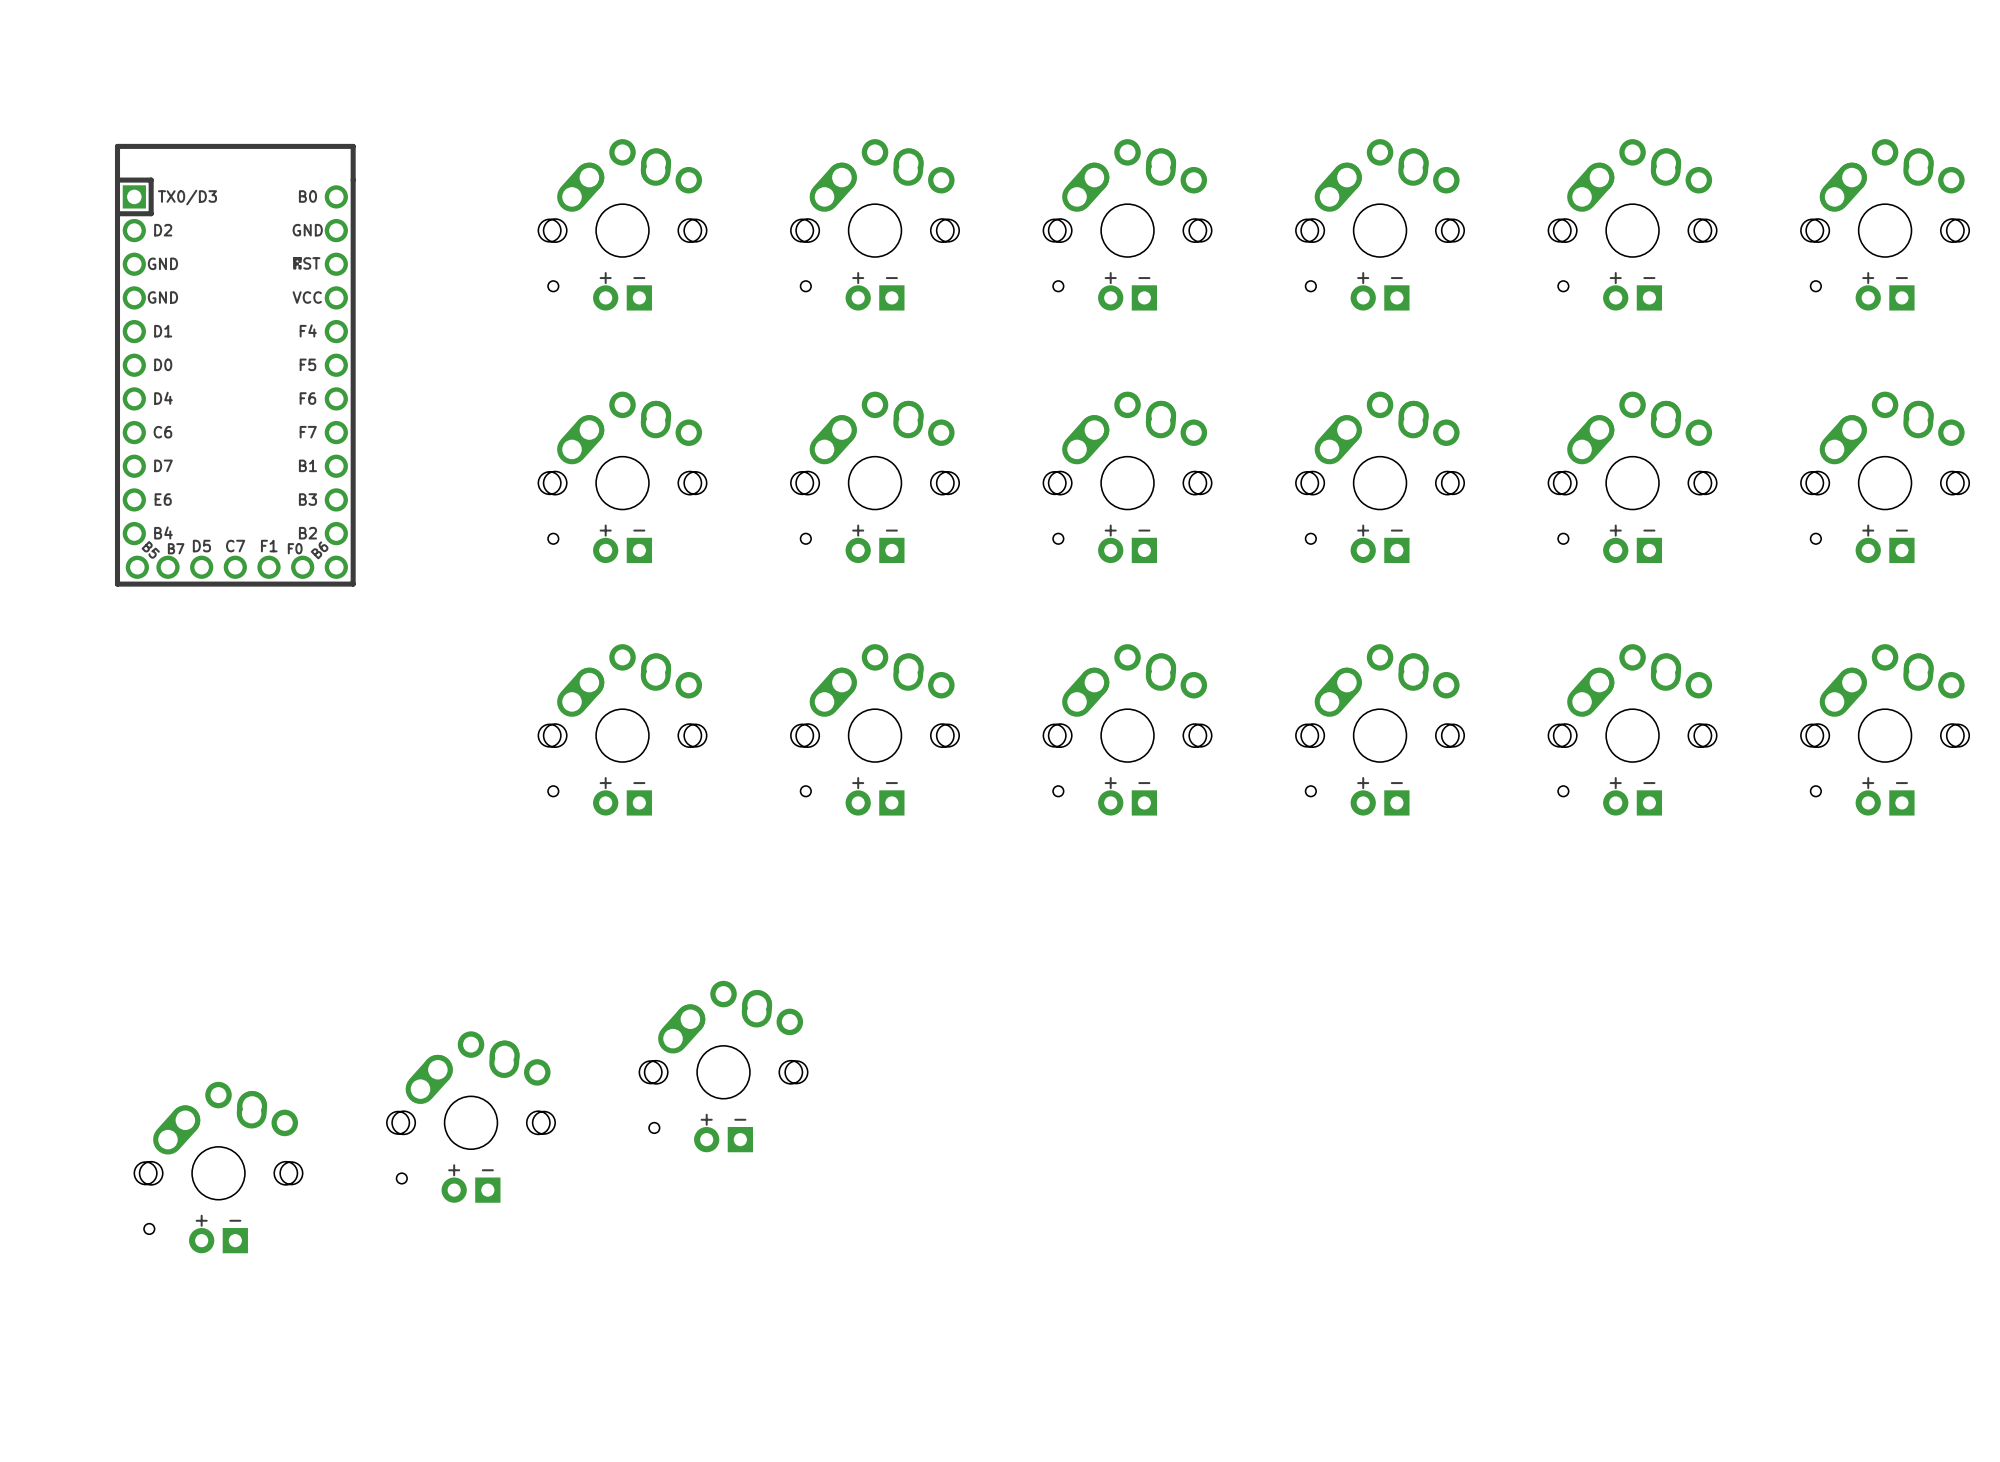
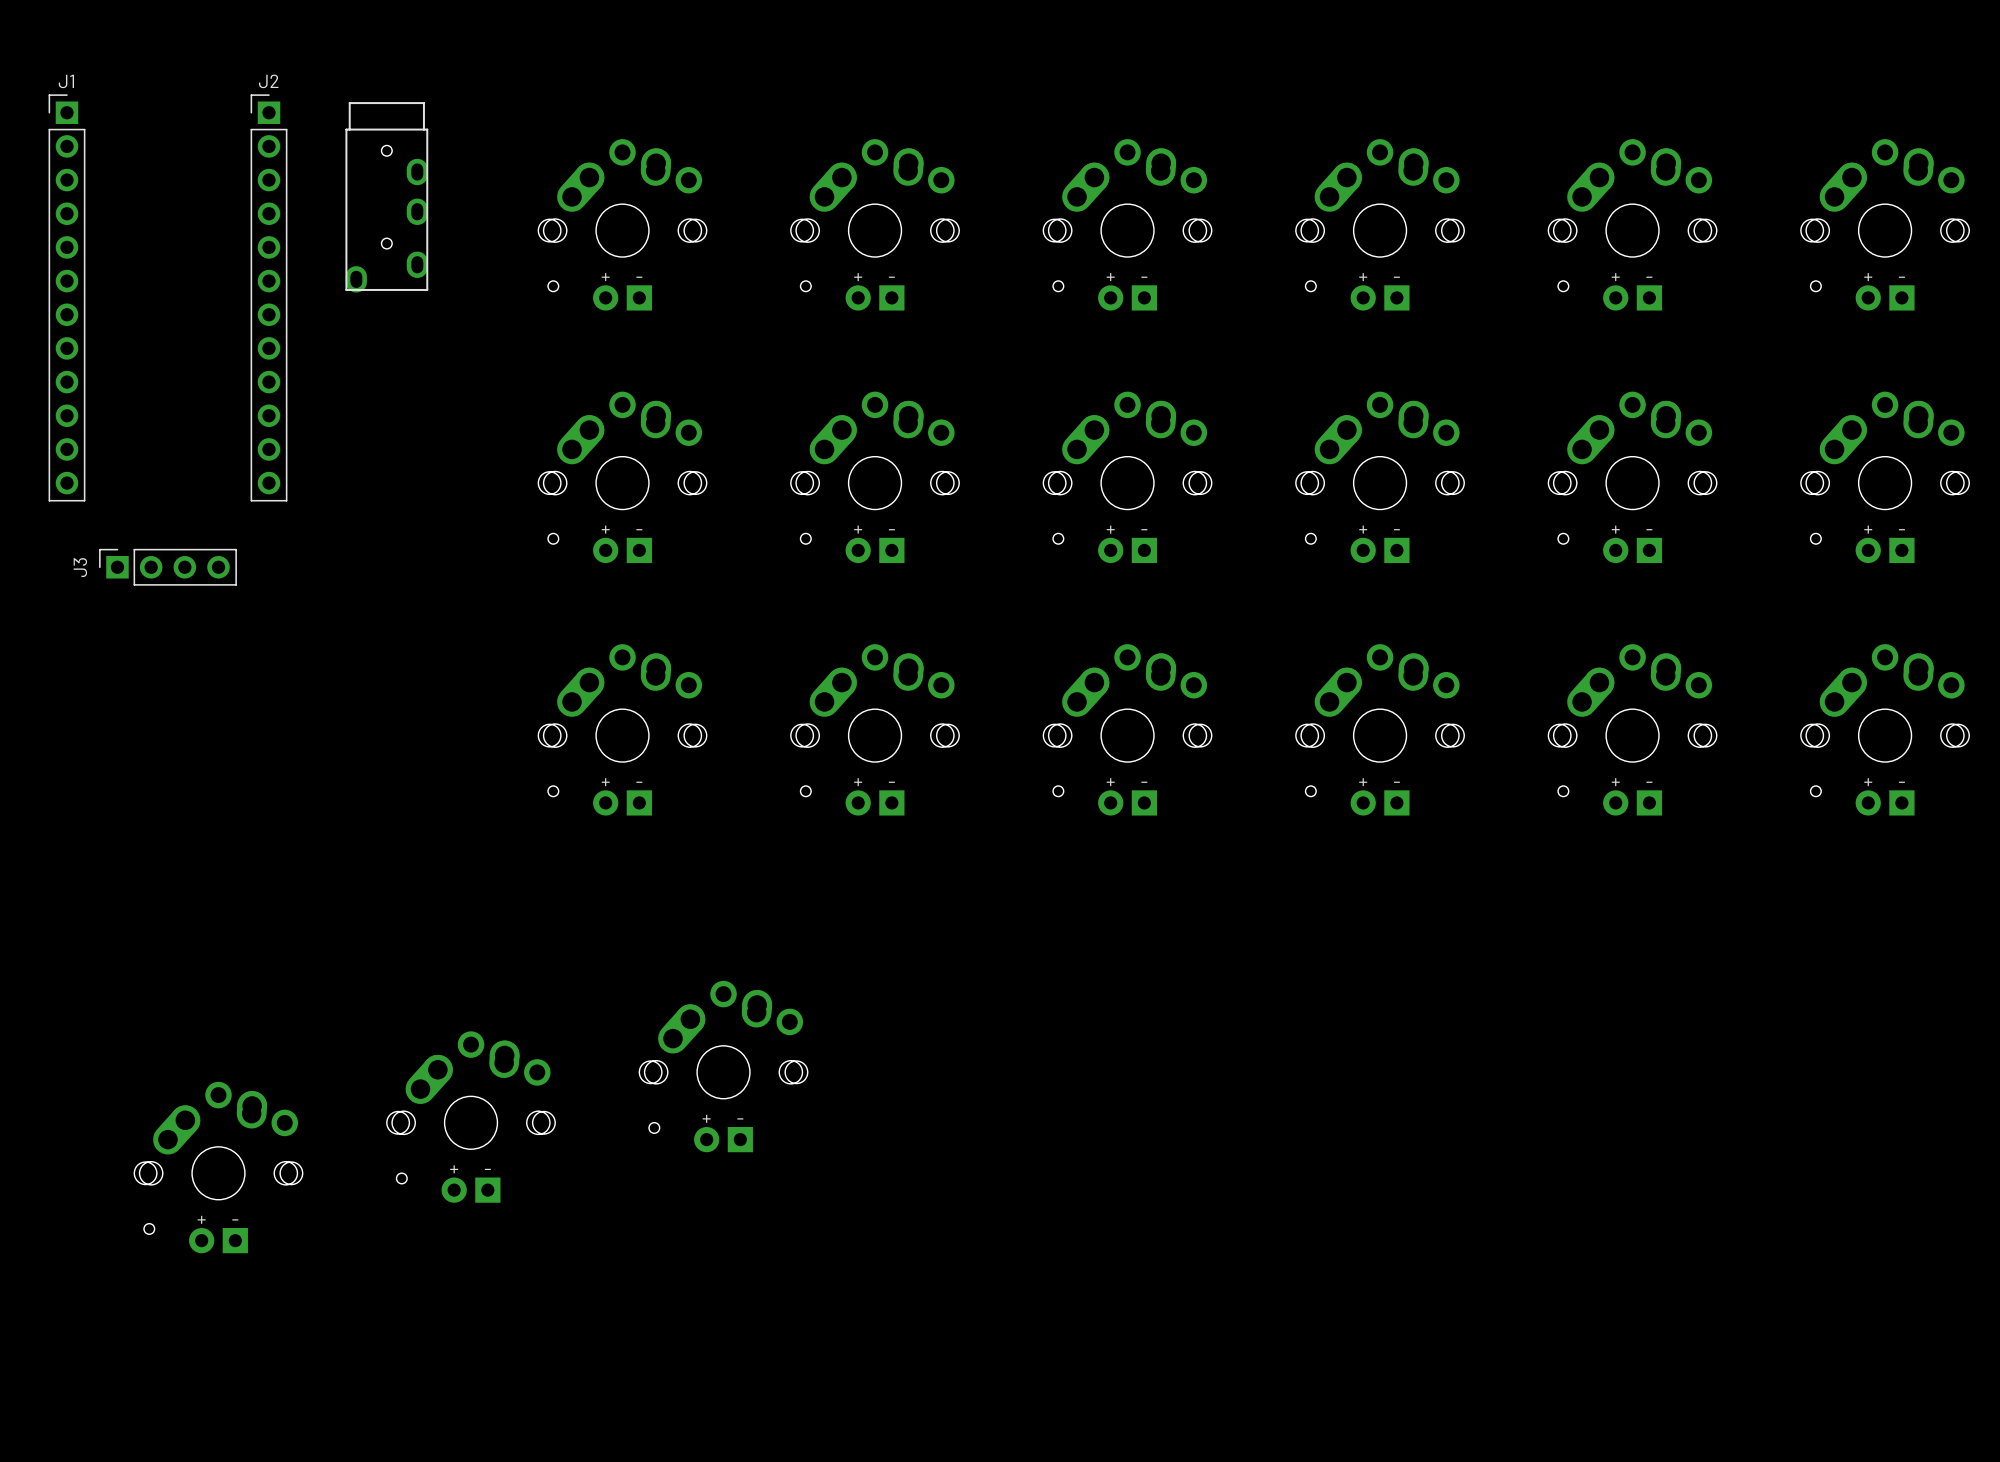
part: none -> (386, 197)
J1: none -> (66, 297)
J2: none -> (269, 297)
part: (235, 365) -> none
J3: none -> (167, 567)

